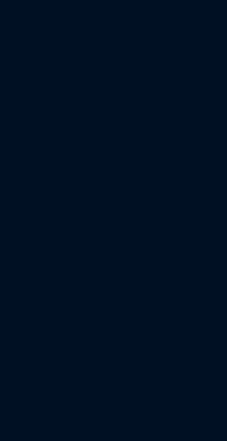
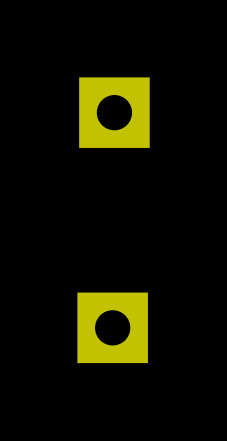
part: none -> (114, 112)
part: none -> (112, 327)

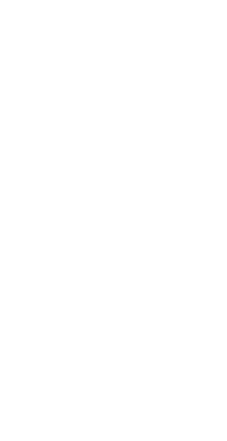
part: (114, 112) -> none
part: (112, 327) -> none

